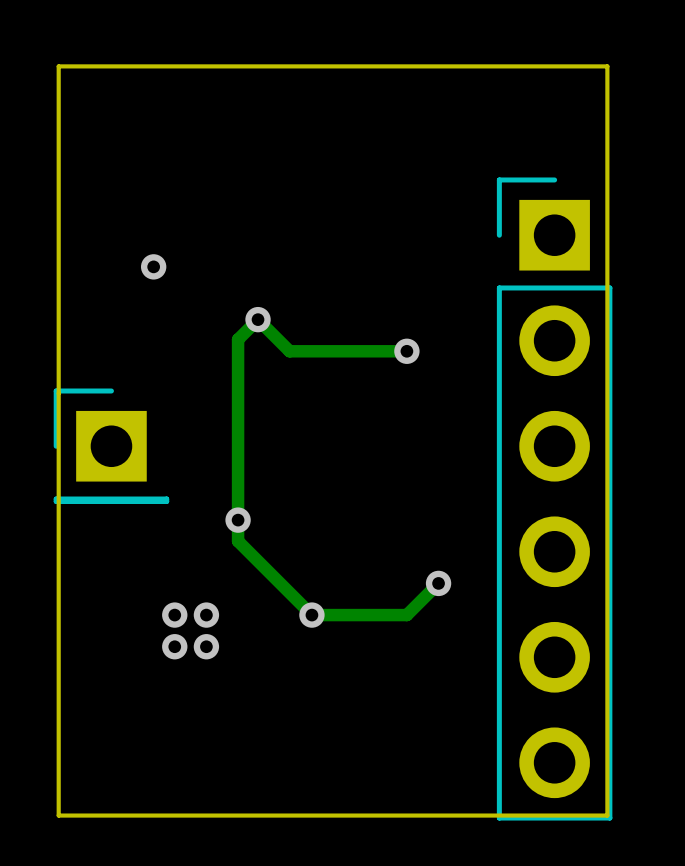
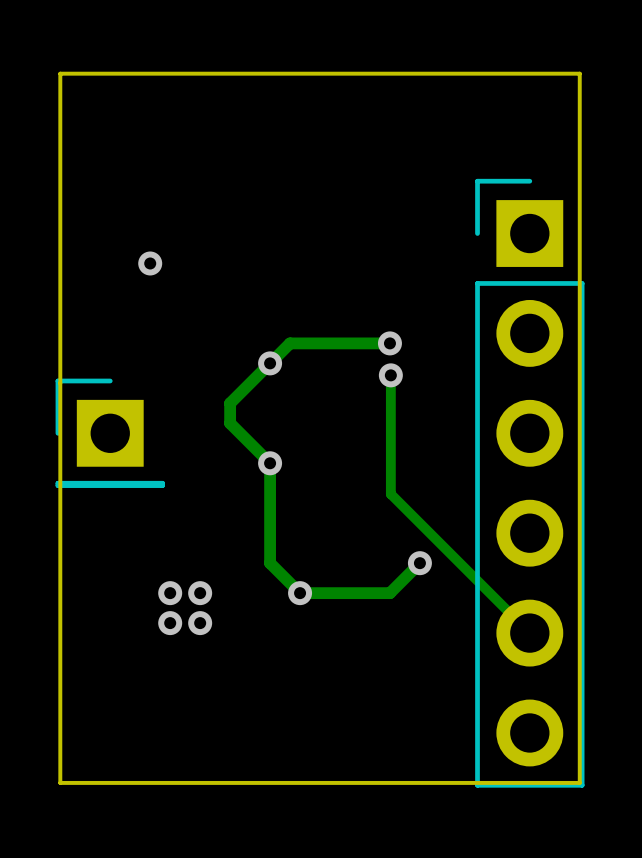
via position: (258, 319) -> (270, 363)
track: (301, 351) (289, 351) (258, 319) (238, 339) (238, 414) -> (290, 343) (230, 403)
track: none -> (390, 375) (390, 494) (529, 633)
via: none -> (390, 375)
track: (238, 435) (238, 541) (280, 583) -> (230, 423) (270, 463) (270, 563)
via position: (238, 520) -> (270, 463)

